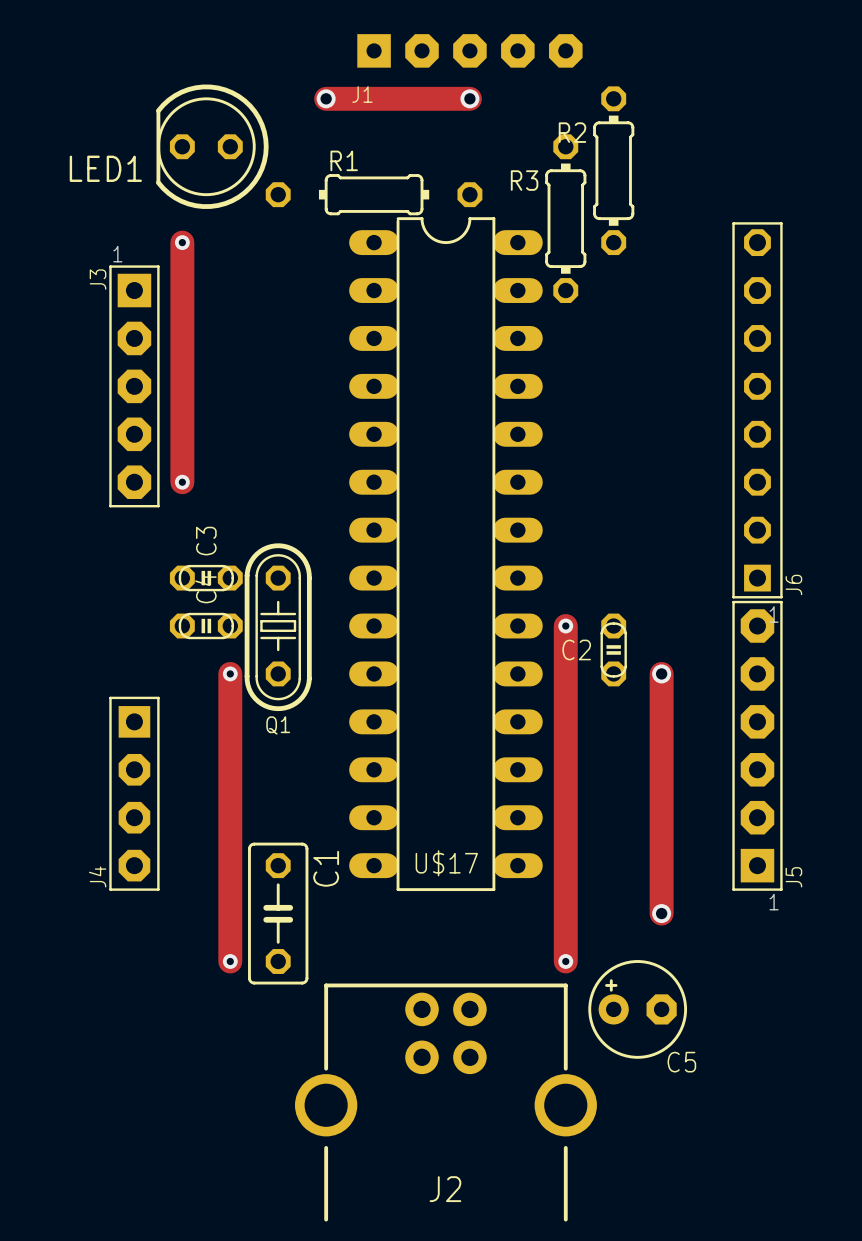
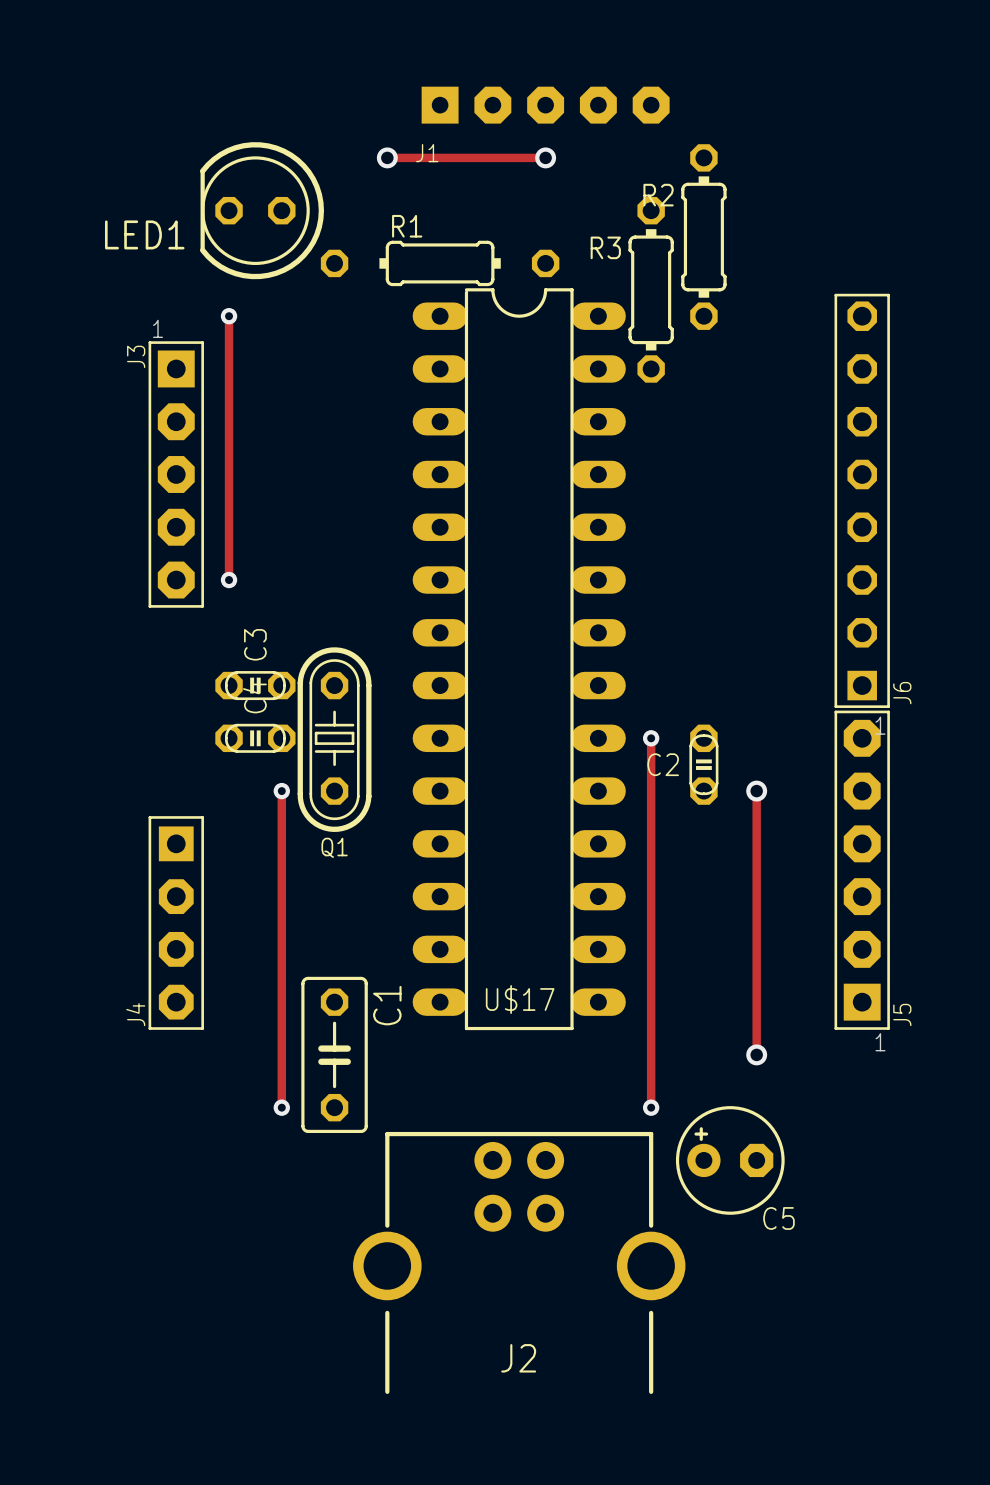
track width: thick (326, 98) (469, 98) -> thin (387, 157) (545, 157)
track width: thick (182, 242) (182, 482) -> thin (229, 316) (229, 580)
track width: thick (565, 626) (565, 961) -> thin (651, 738) (651, 1107)
track width: thick (230, 673) (230, 961) -> thin (281, 791) (281, 1107)
track width: thick (661, 673) (661, 913) -> thin (756, 791) (756, 1054)

